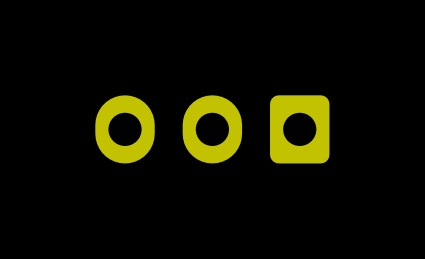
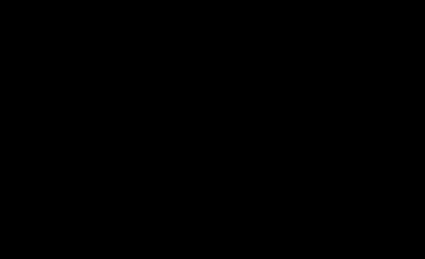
part: (212, 129) -> none

